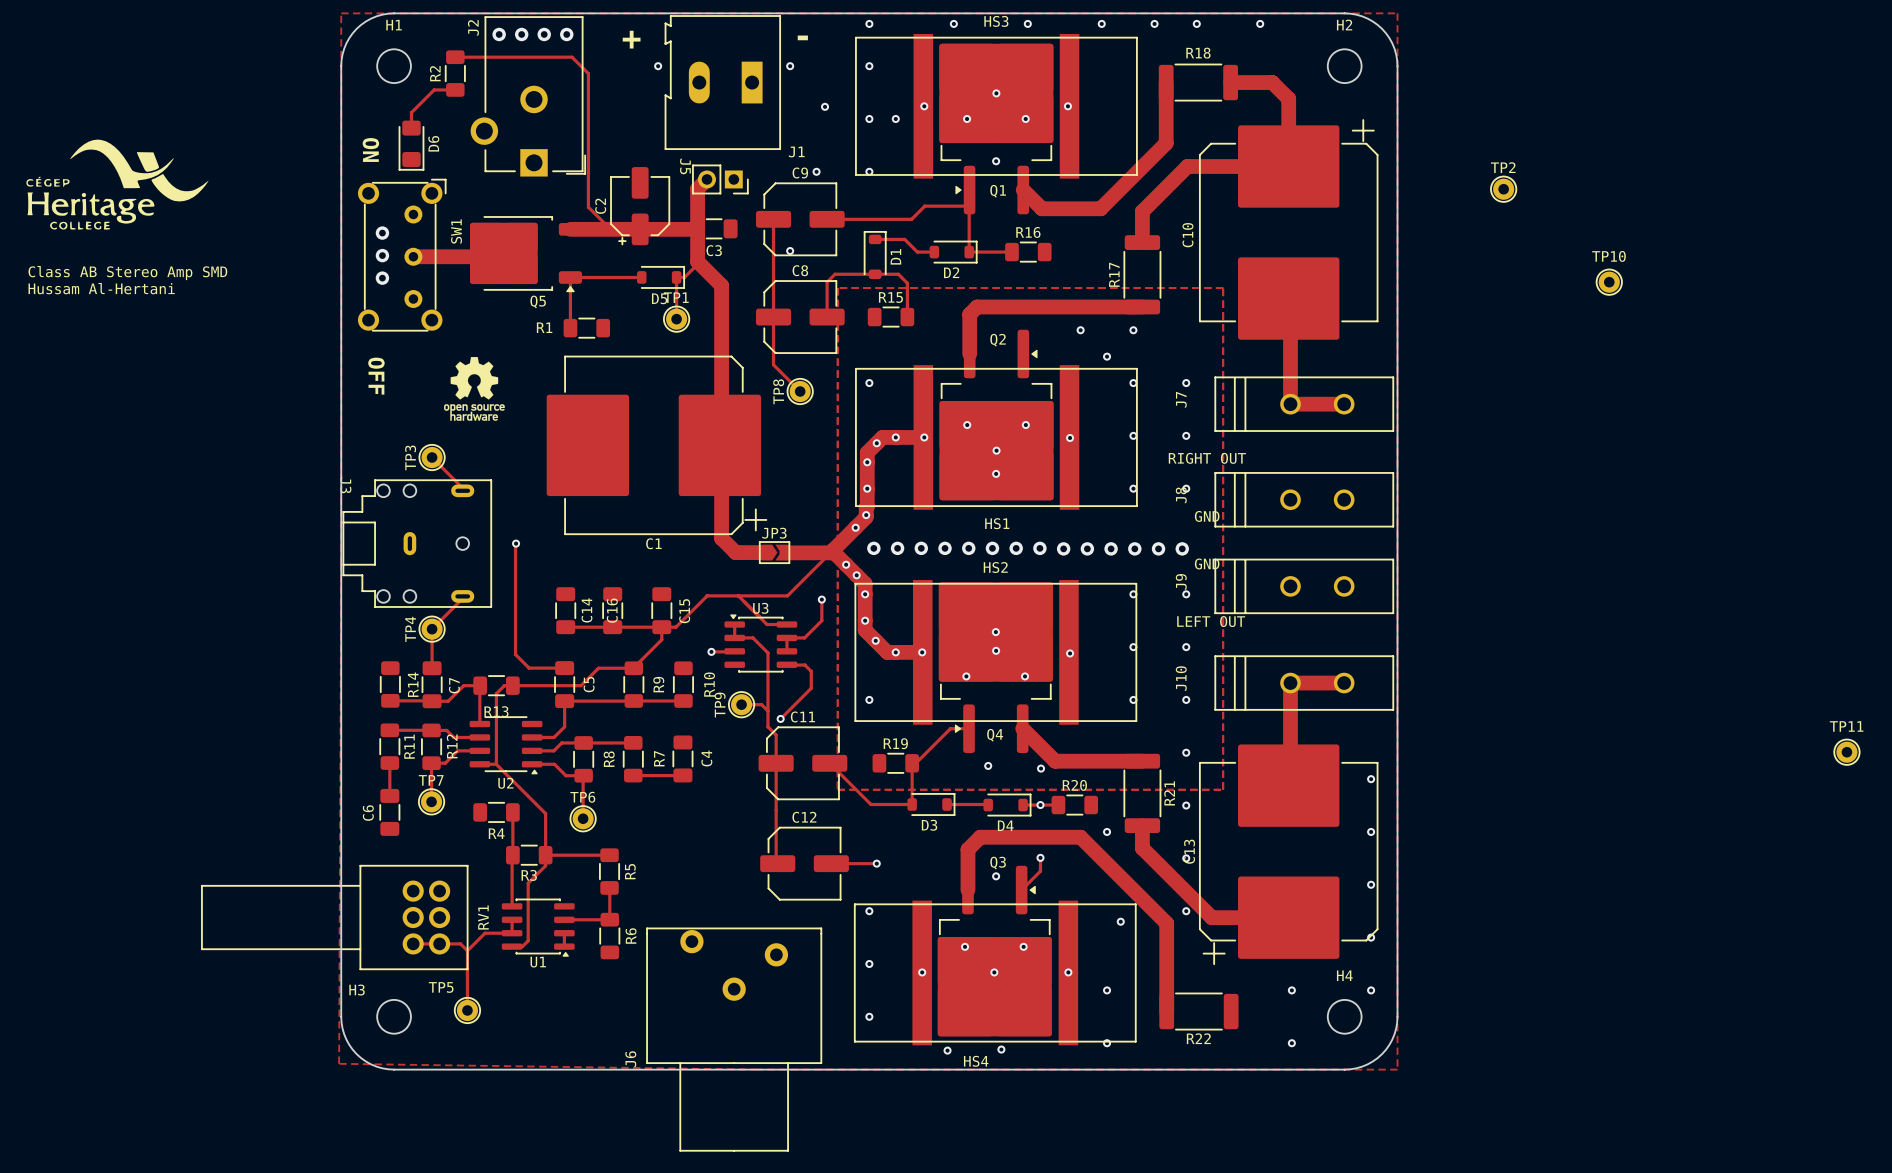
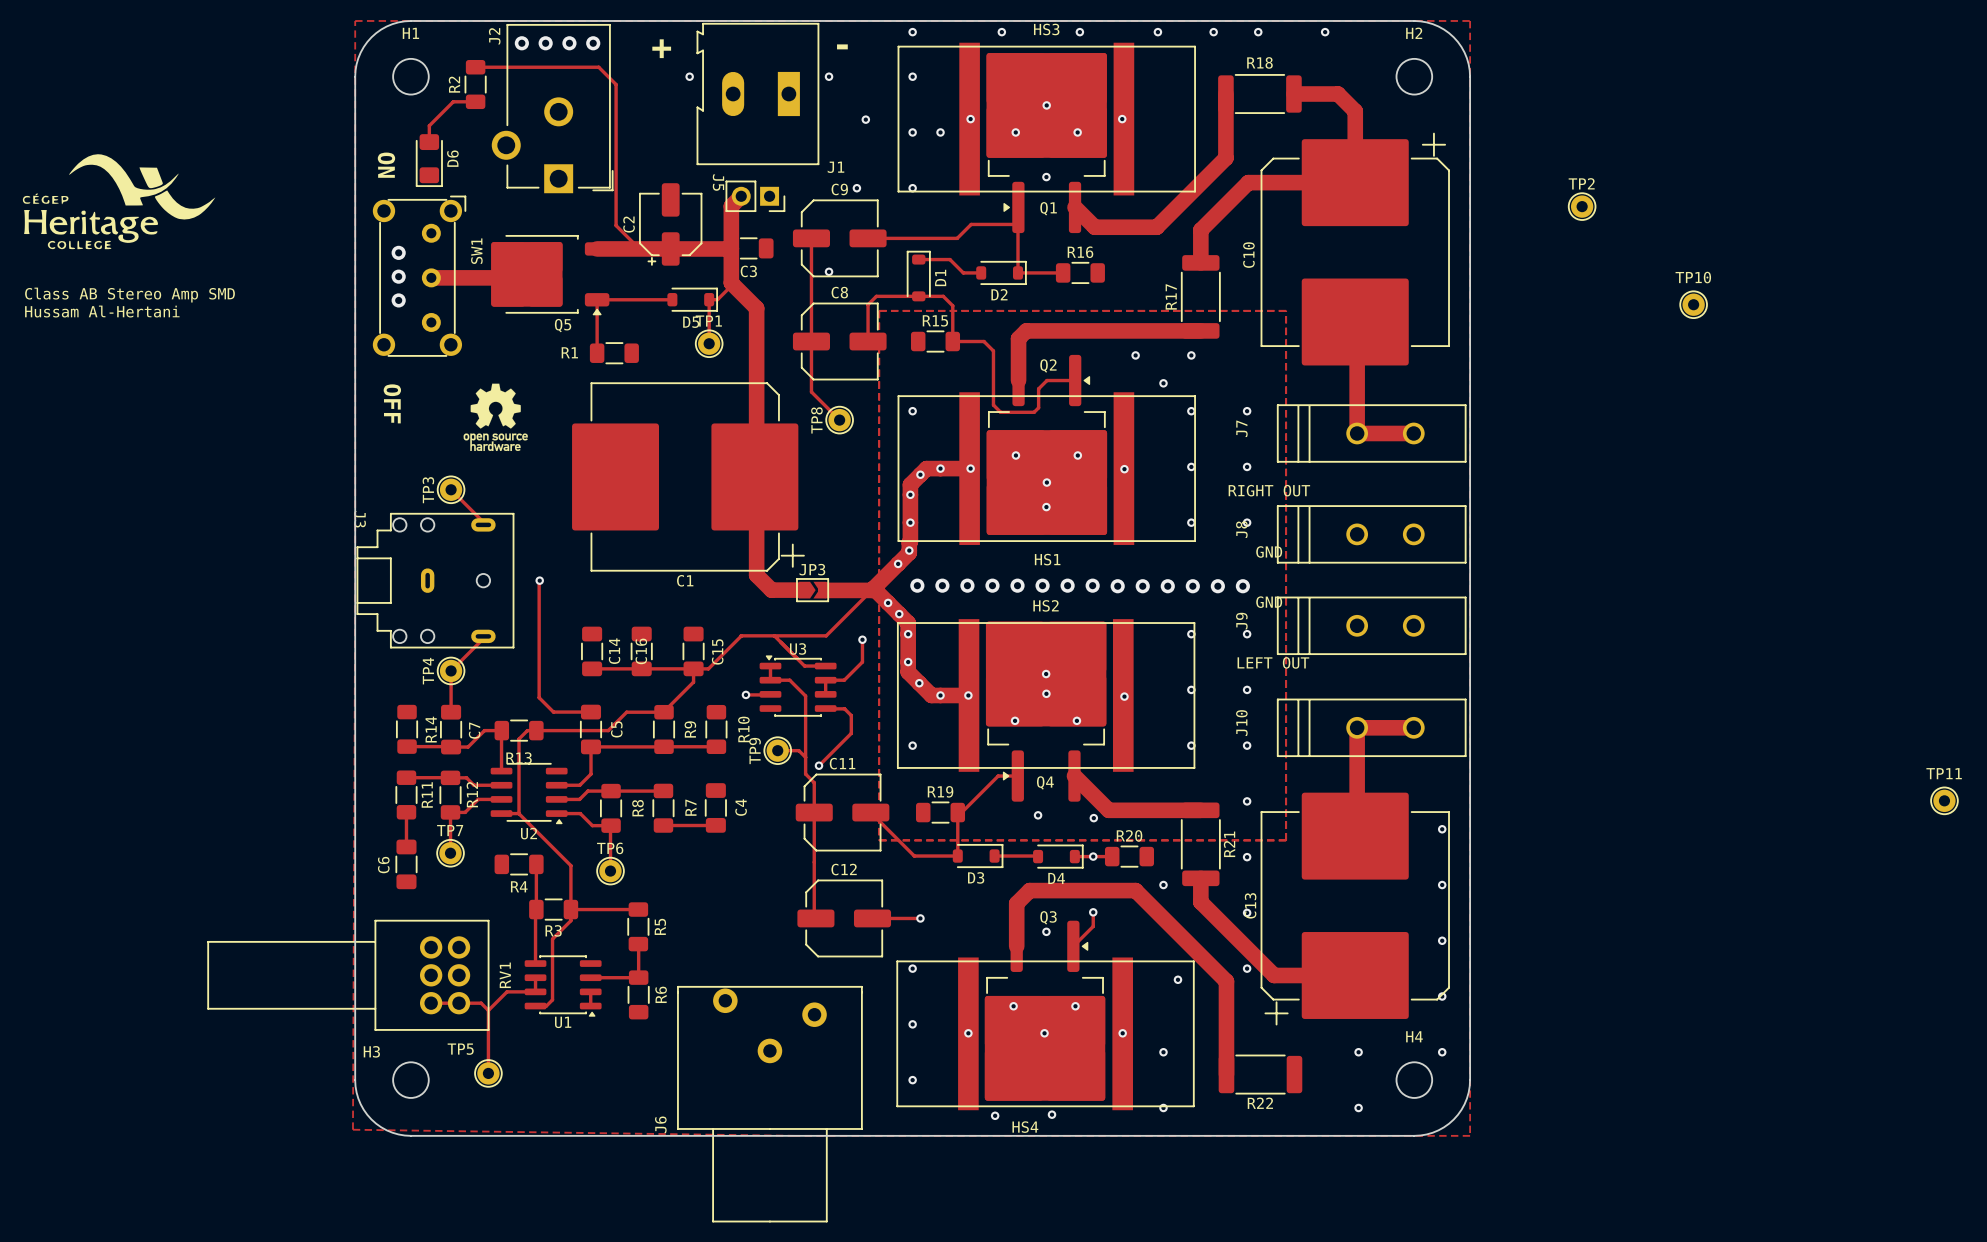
track: none -> (952, 341) (983, 341) (993, 350) (993, 405) (1000, 412) (1034, 412) (1038, 407) (1038, 388) (1046, 380) (1075, 380)

